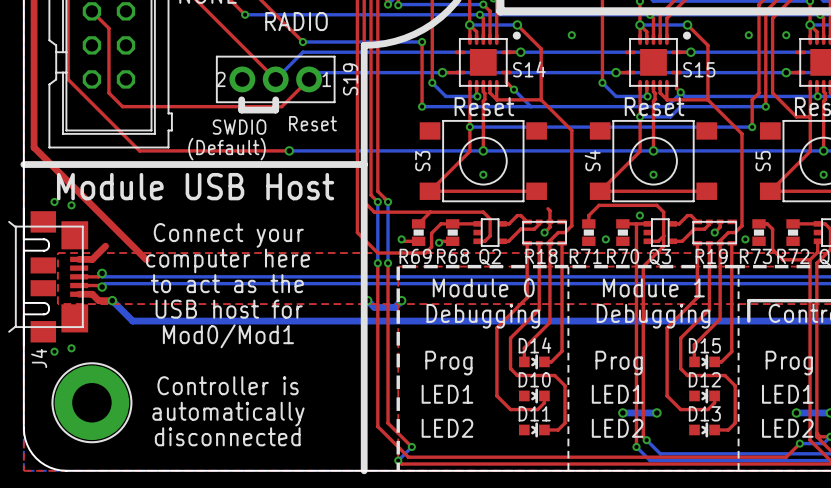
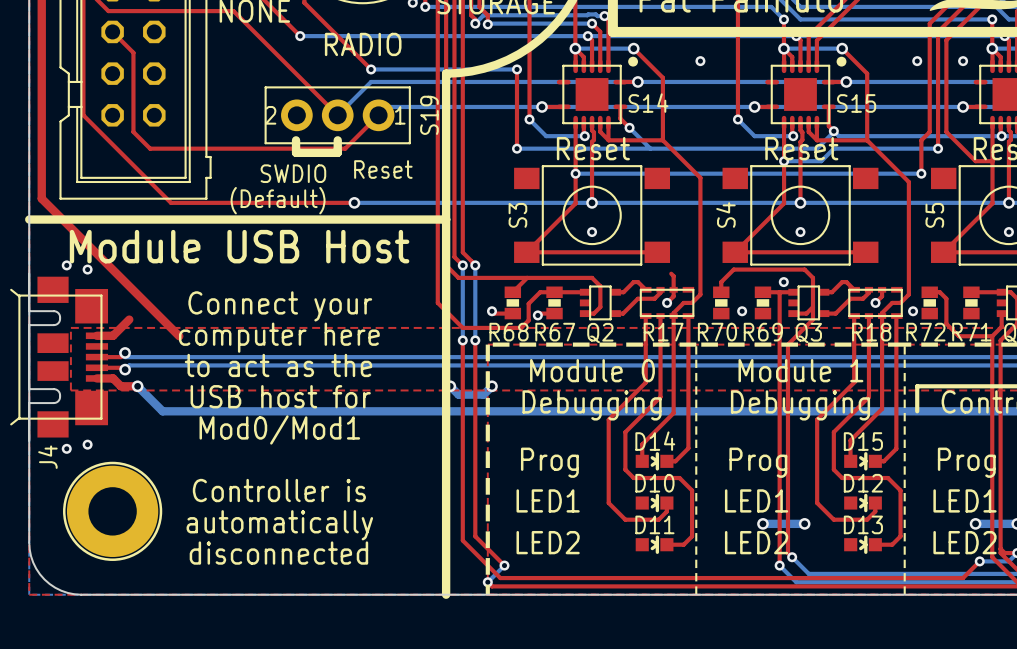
R69 name: R69 (415, 256) -> R68 (509, 332)
R68 name: R68 (452, 256) -> R67 (555, 332)
R18 name: R18 (541, 256) -> R17 (663, 332)
R71 name: R71 (585, 256) -> R70 (717, 332)
R70 name: R70 (623, 256) -> R69 (763, 332)
R19 name: R19 (711, 256) -> R18 (871, 332)
R73 name: R73 (755, 256) -> R72 (925, 332)
R72 name: R72 (793, 256) -> R71 (971, 332)

